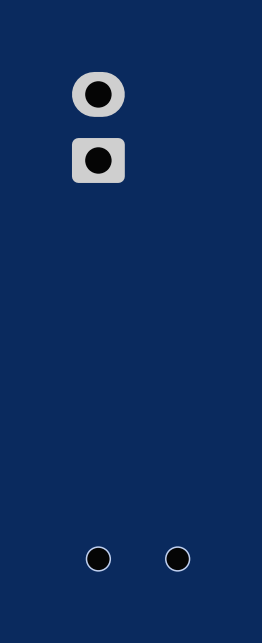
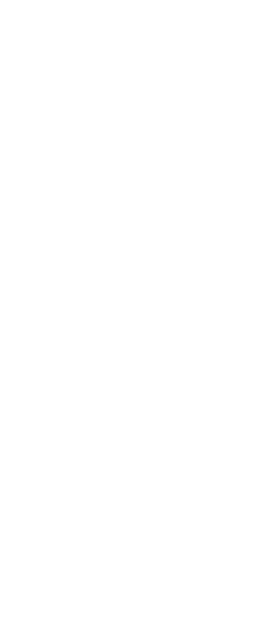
part: (98, 127) -> none
part: (138, 558) -> none

